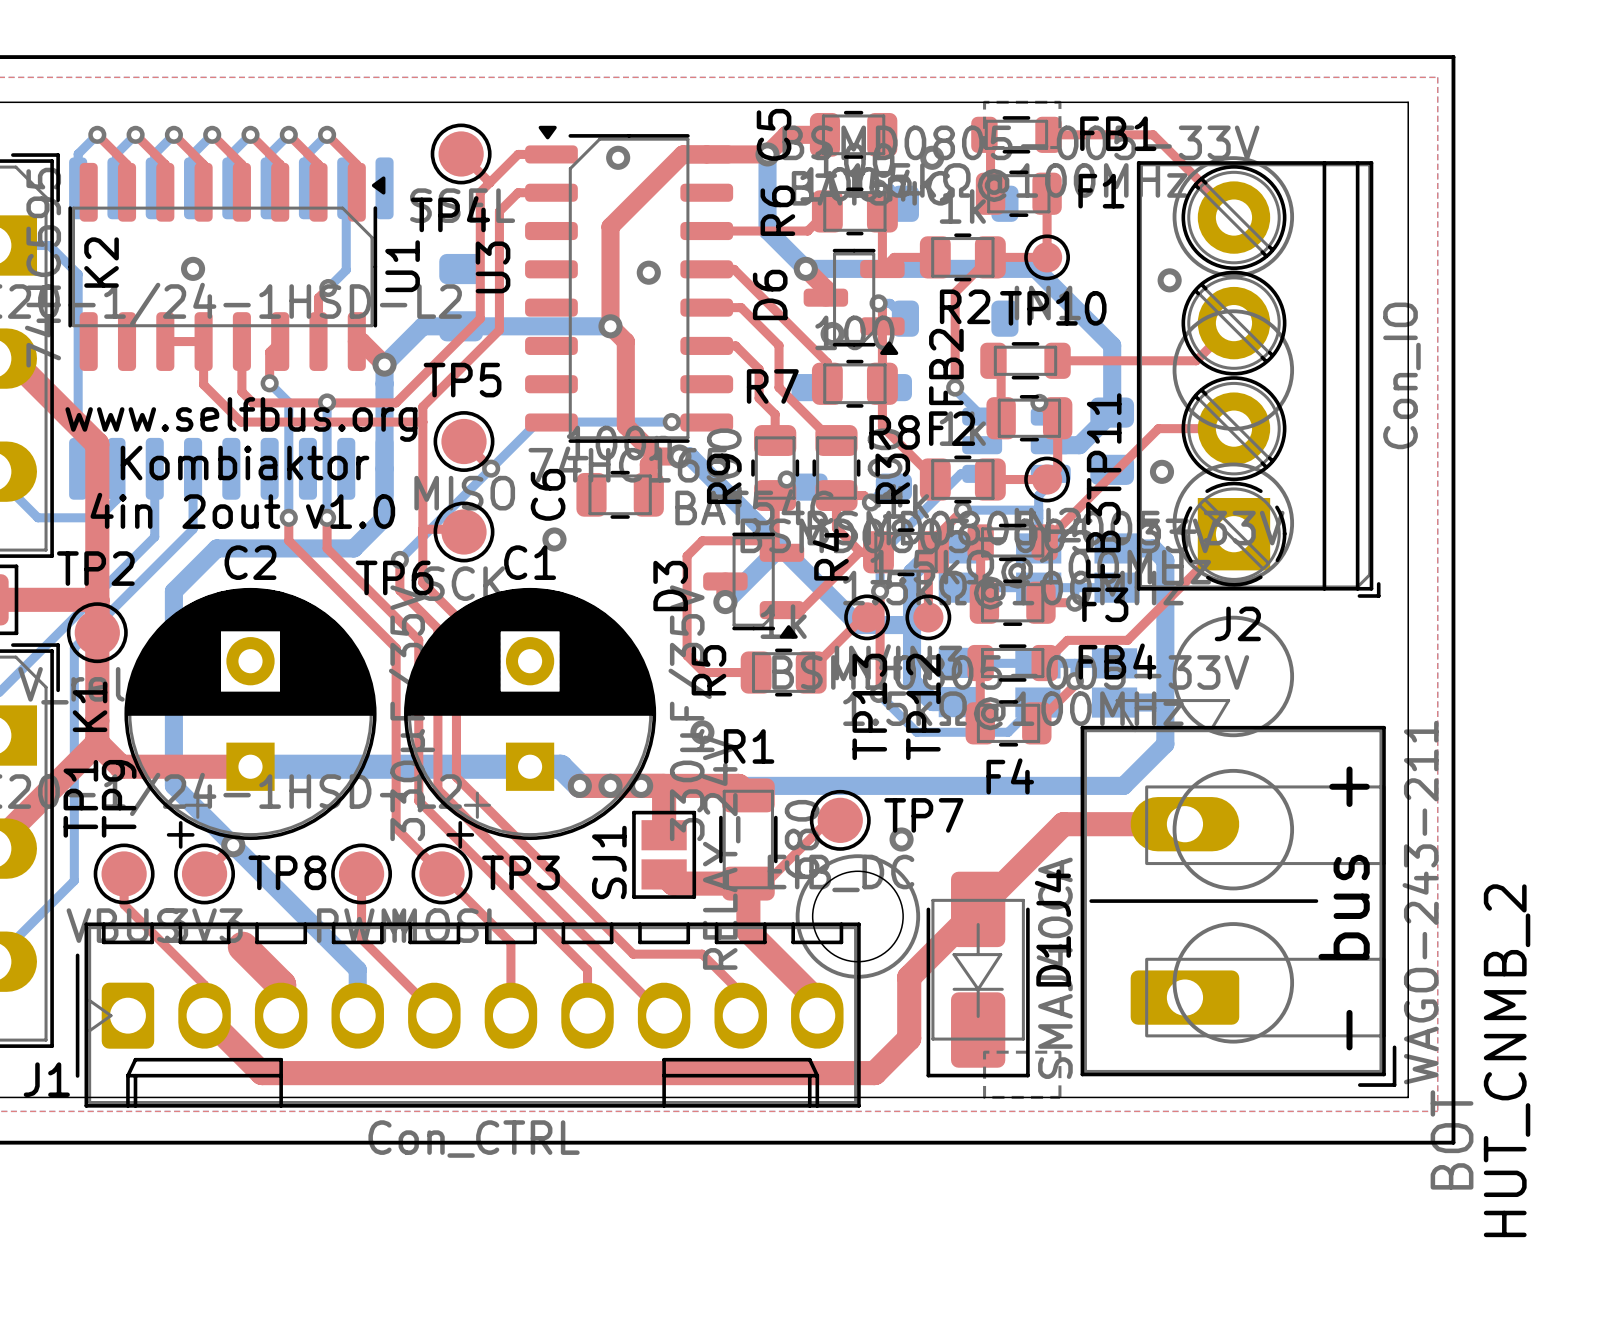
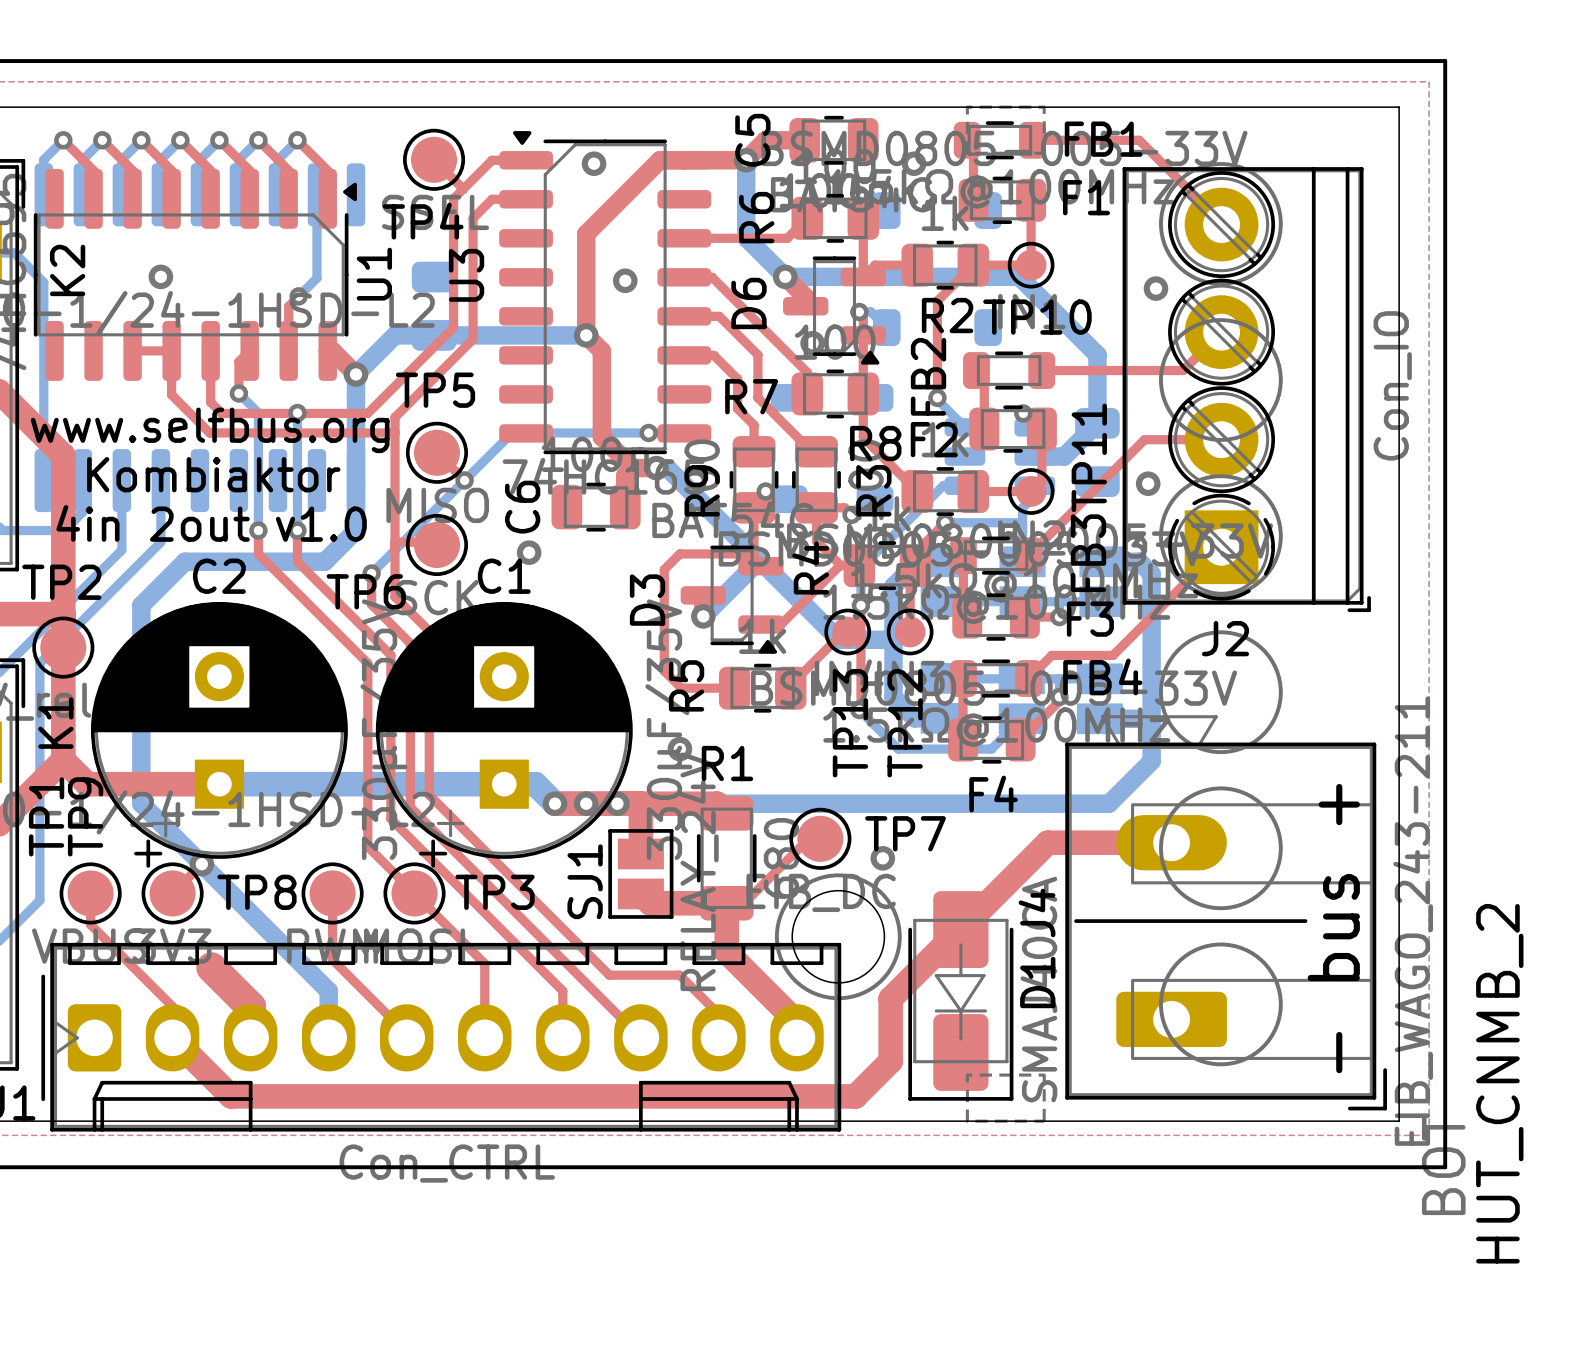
J4 value: WAGO-243-211 (1420, 902) -> EIB_WAGO_243-211 (1413, 921)

